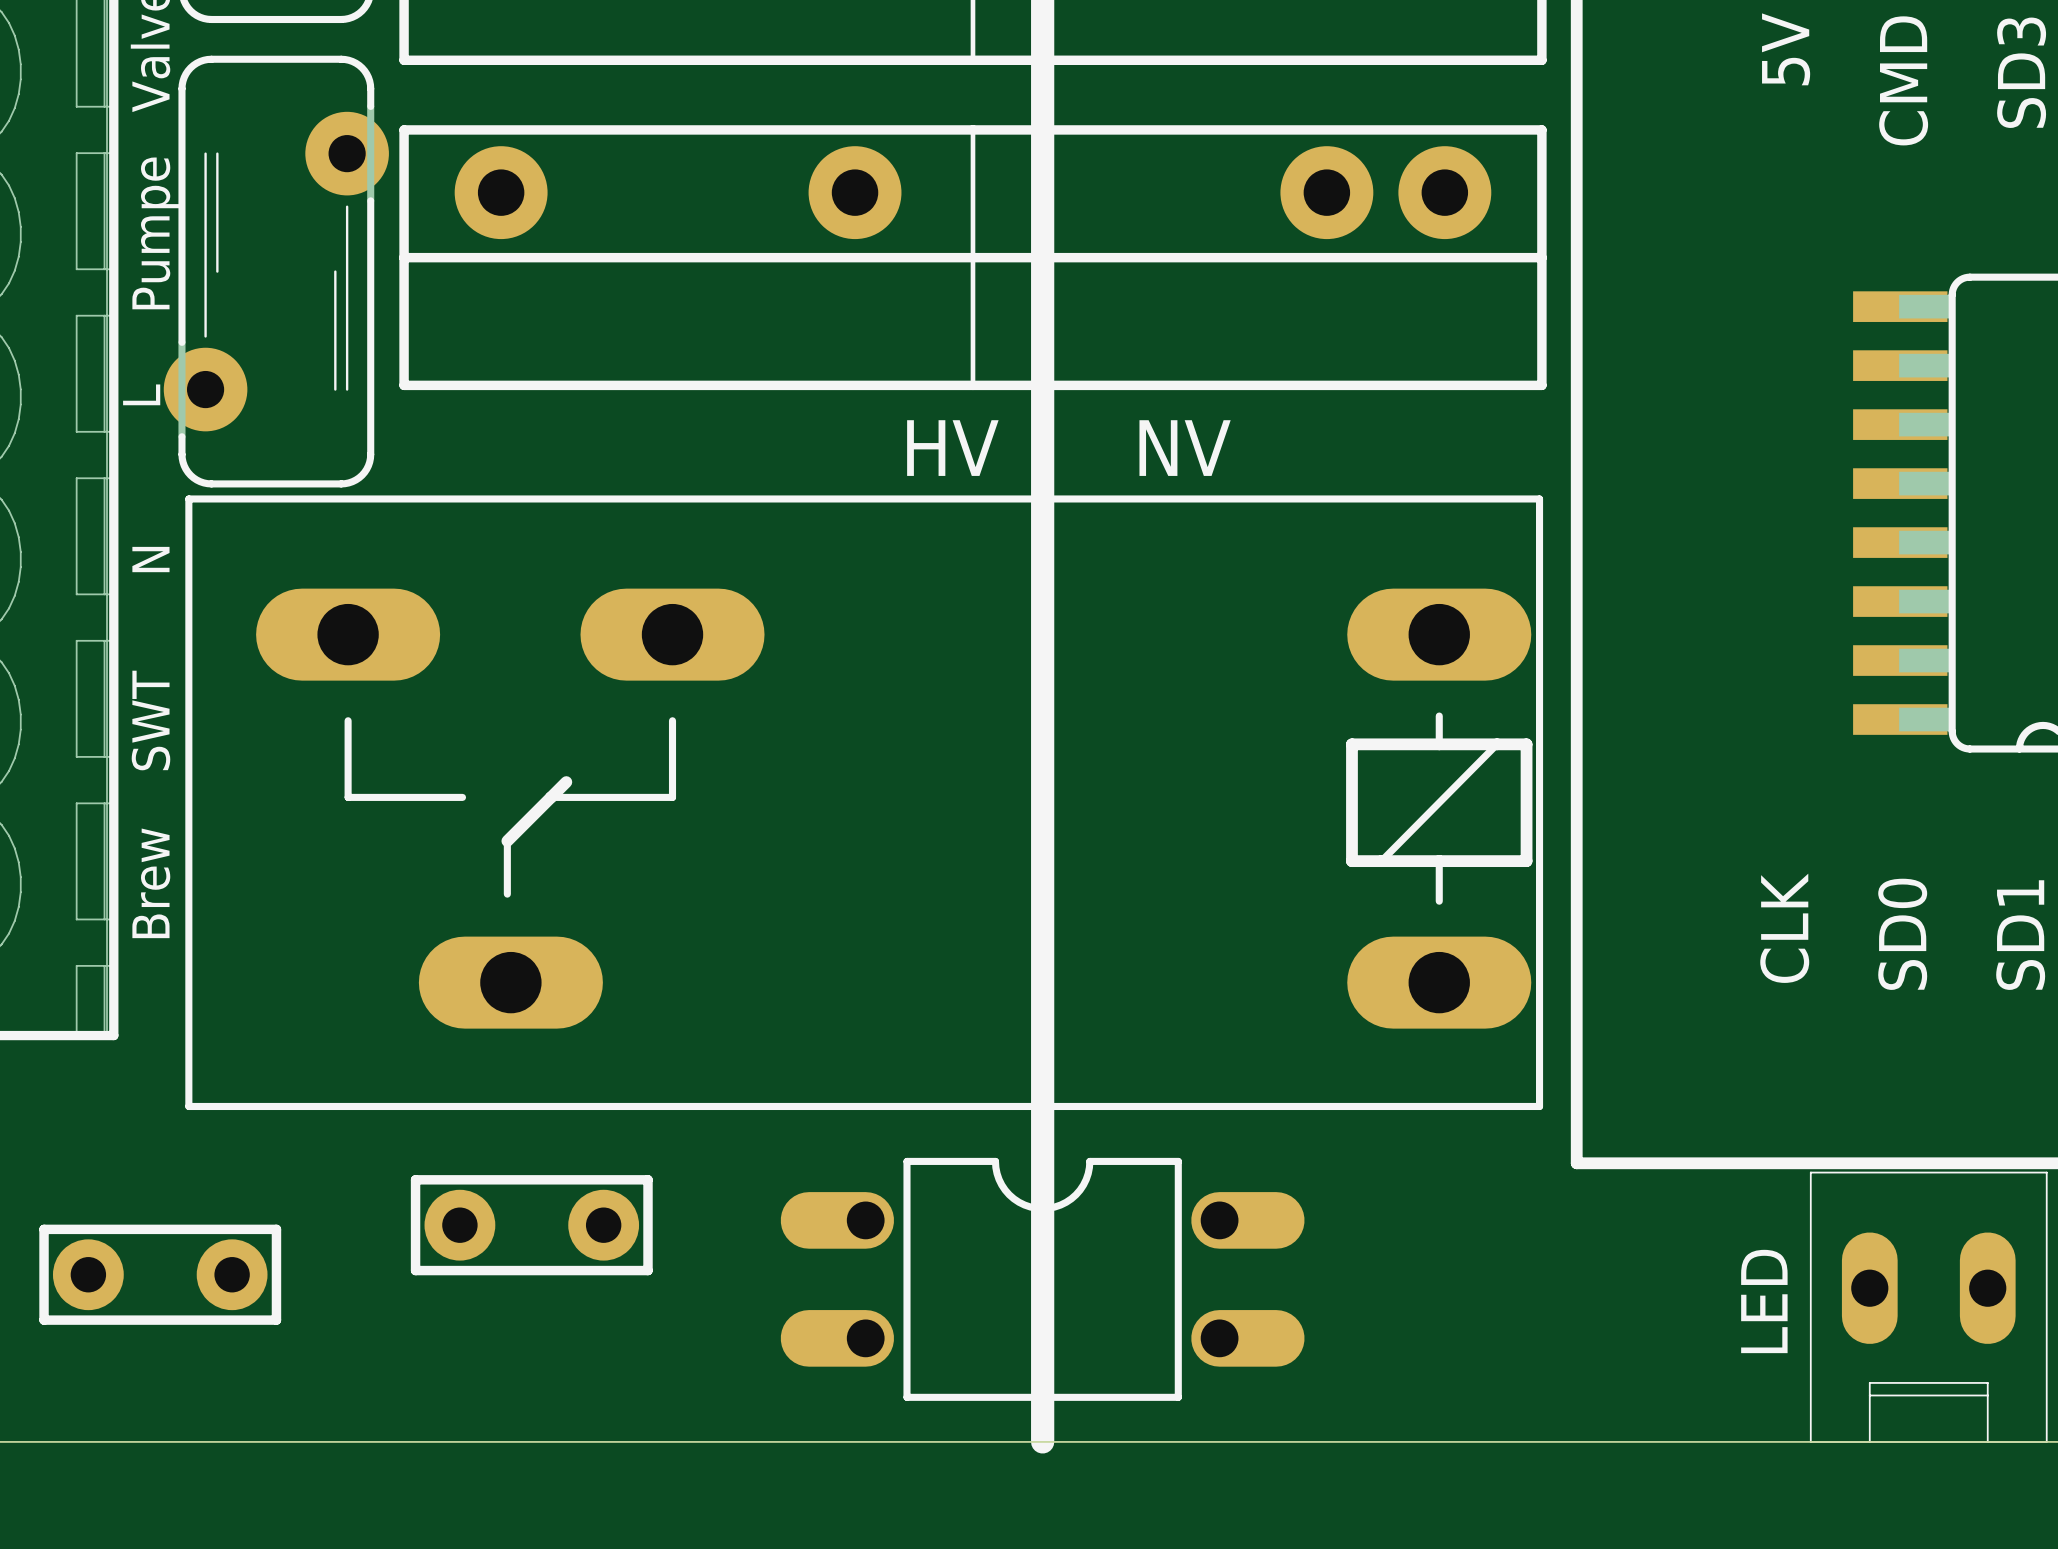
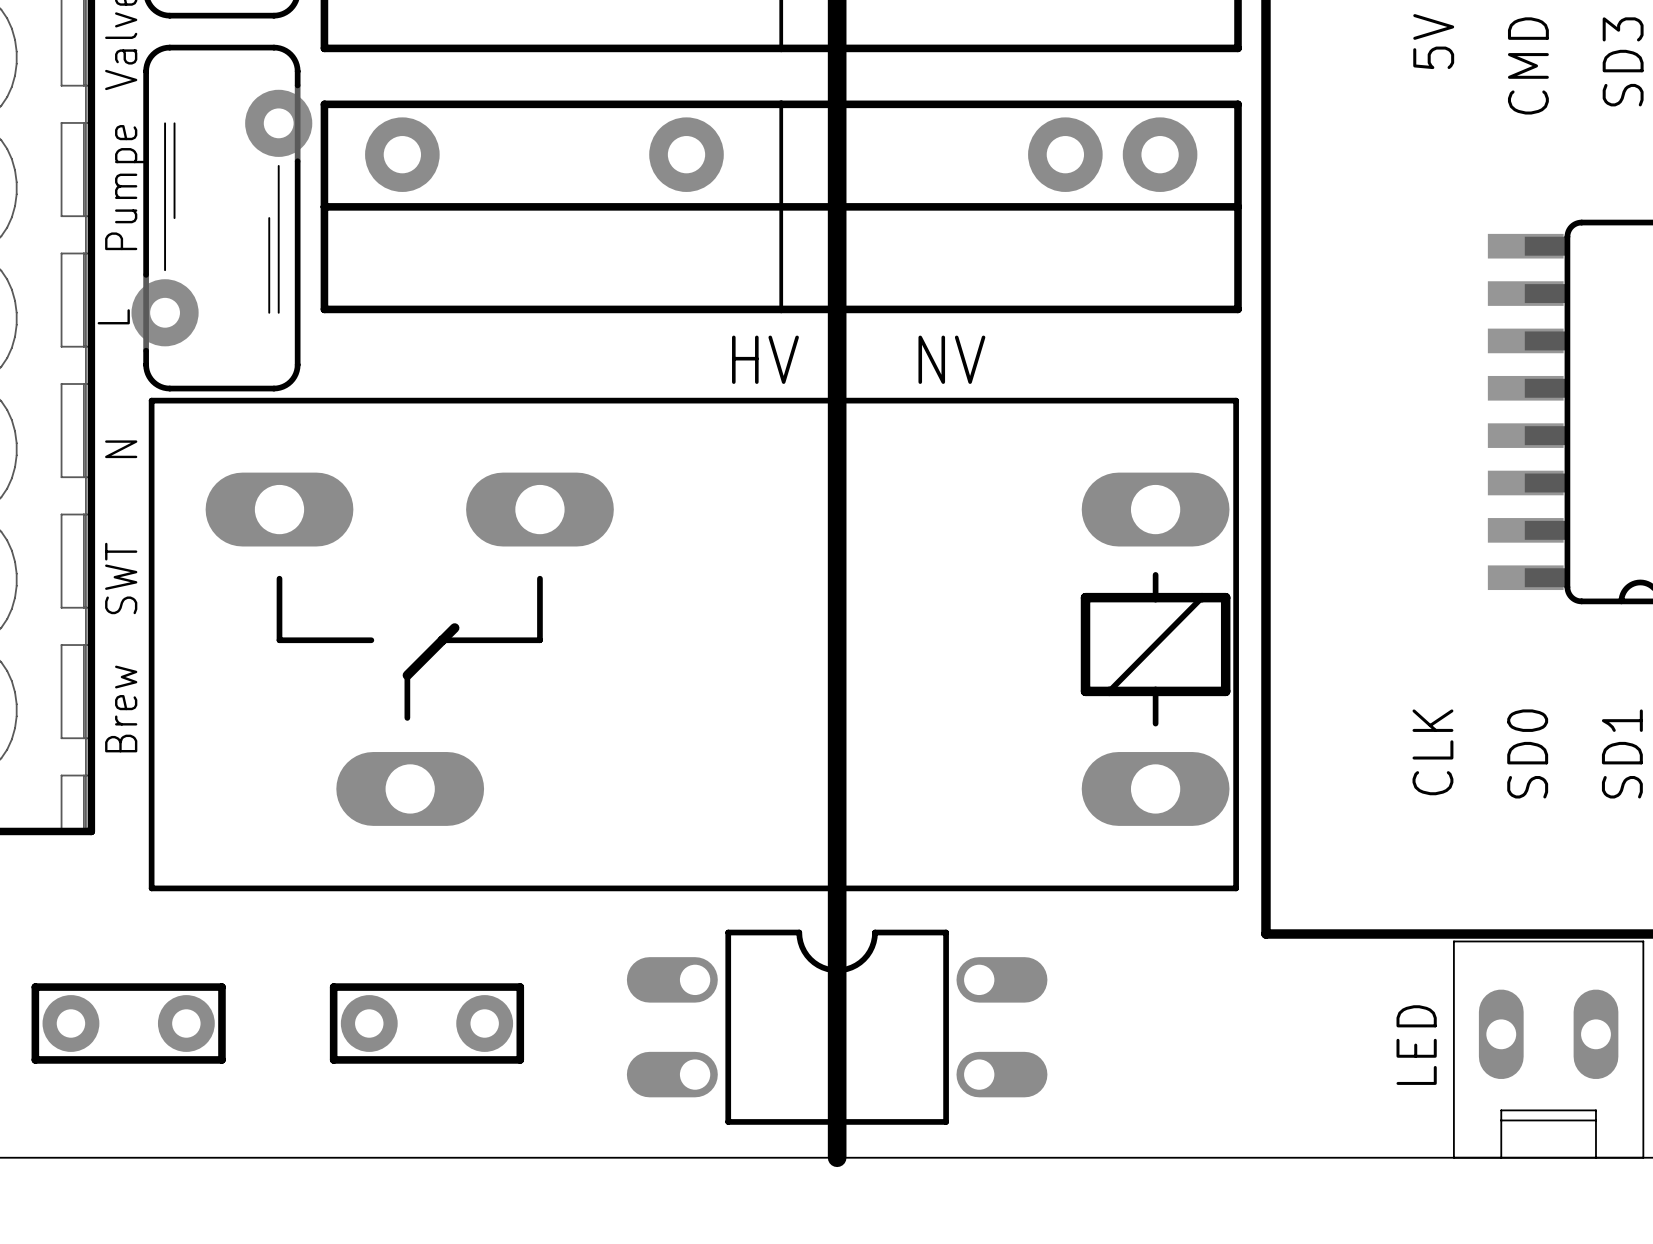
part position: (531, 1225) -> (426, 1023)

